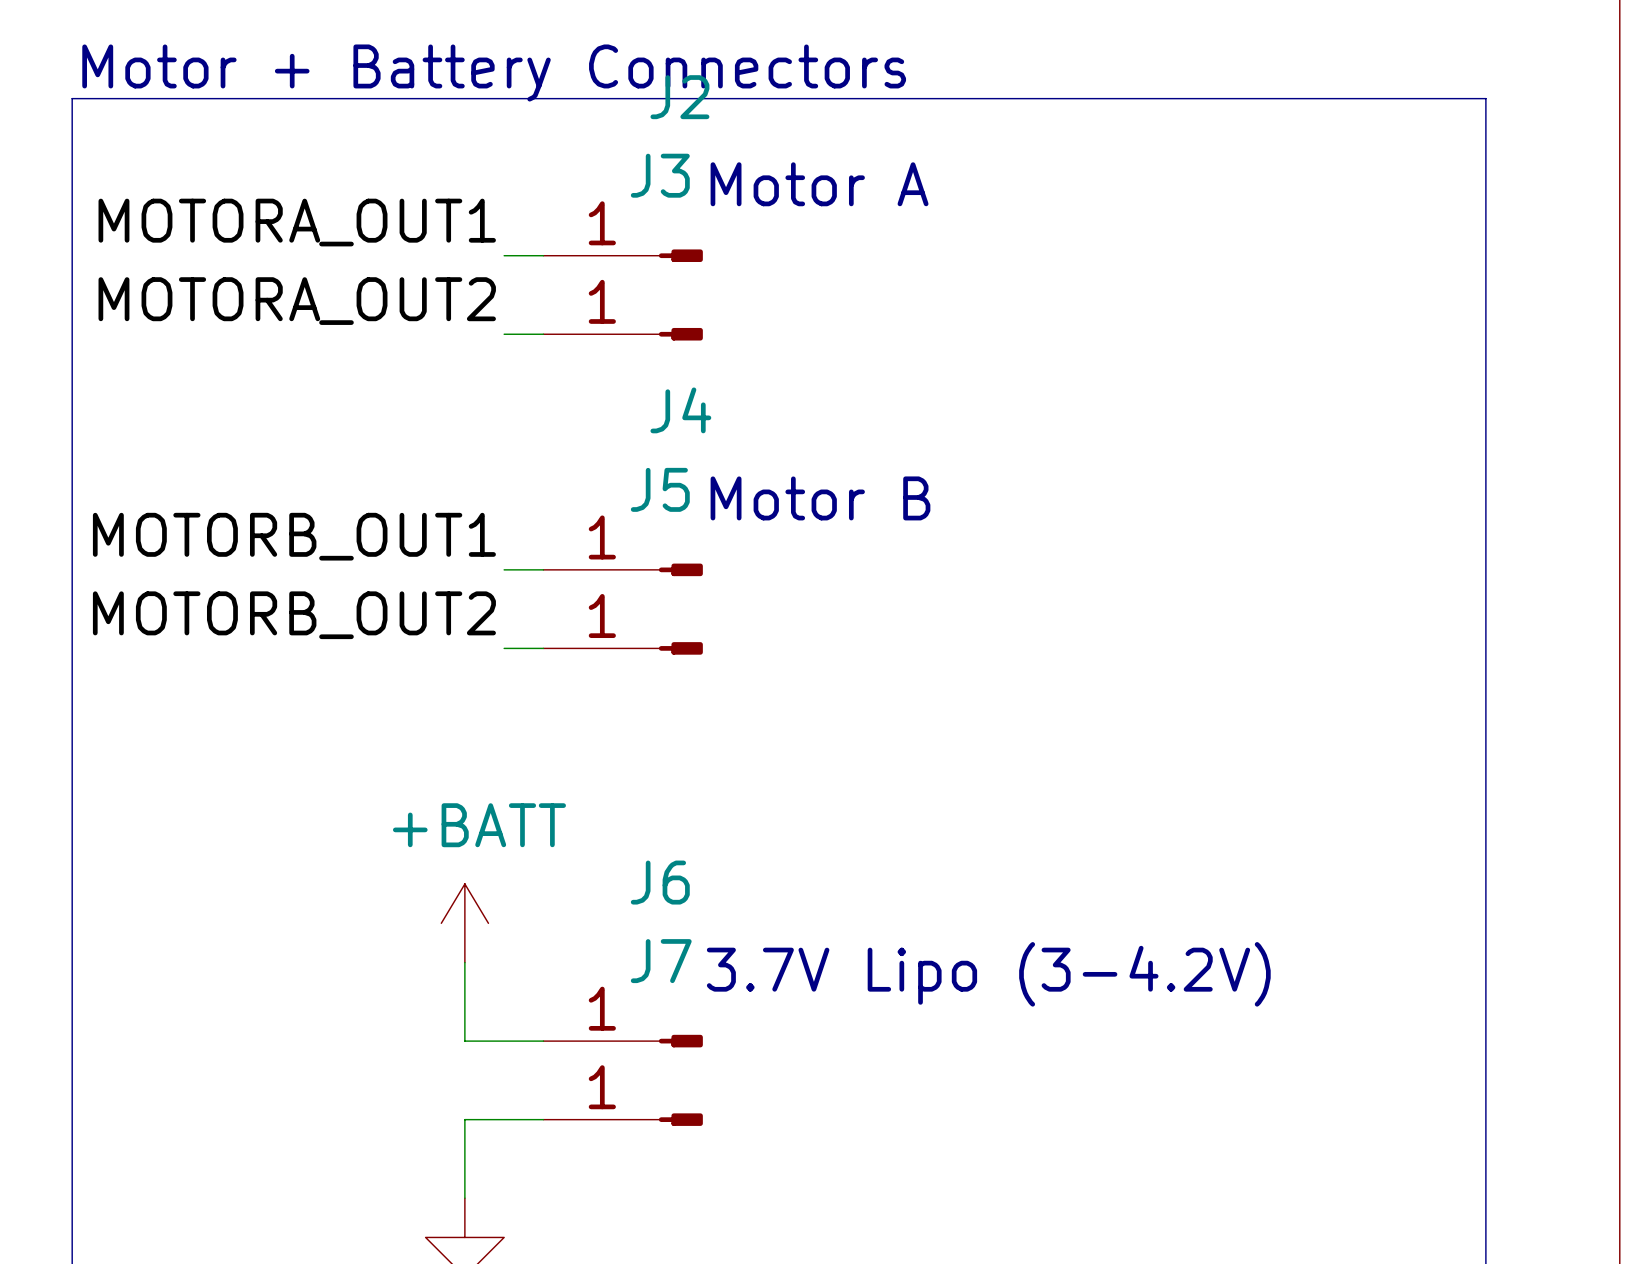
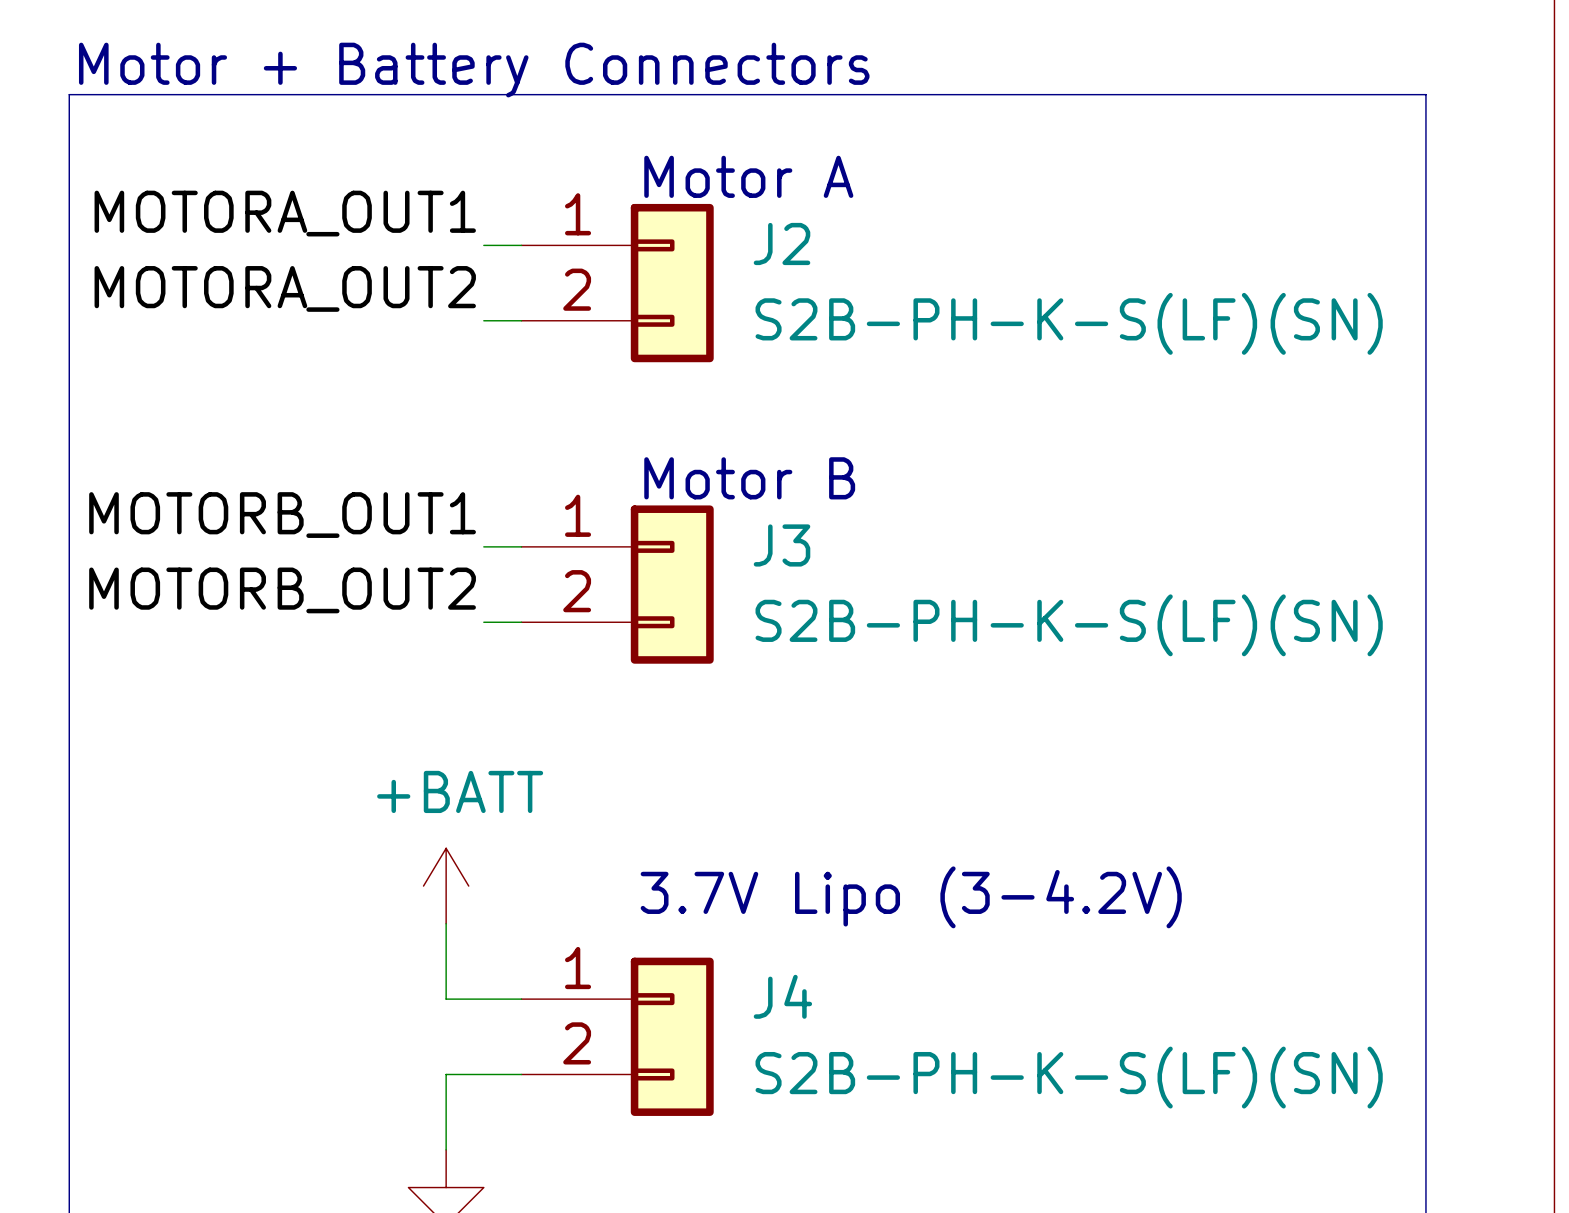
J2 name position: J2 (679, 97) -> J2 (782, 243)
J3 name position: J3 (660, 175) -> J3 (782, 545)
text position: Motor A (819, 184) -> Motor A (748, 176)
J2 symbol: [543, 249, 703, 262] -> [521, 203, 714, 363]
J3 symbol: [543, 327, 703, 341] -> [521, 505, 714, 664]
J2 value: none -> S2B-PH-K-S(LF)(SN) (1069, 323)
J4 name position: J4 (680, 410) -> J4 (782, 996)
text position: Motor B (820, 498) -> Motor B (749, 478)
J4 symbol: [543, 563, 703, 577] -> [521, 957, 714, 1116]
J5: (623, 648) -> none
J3 value: none -> S2B-PH-K-S(LF)(SN) (1069, 625)
text position: 3.7V Lipo (3-4.2V) (988, 974) -> 3.7V Lipo (3-4.2V) (911, 897)
J6: (623, 1041) -> none
J7: (623, 1119) -> none
J4 value: none -> S2B-PH-K-S(LF)(SN) (1069, 1077)

